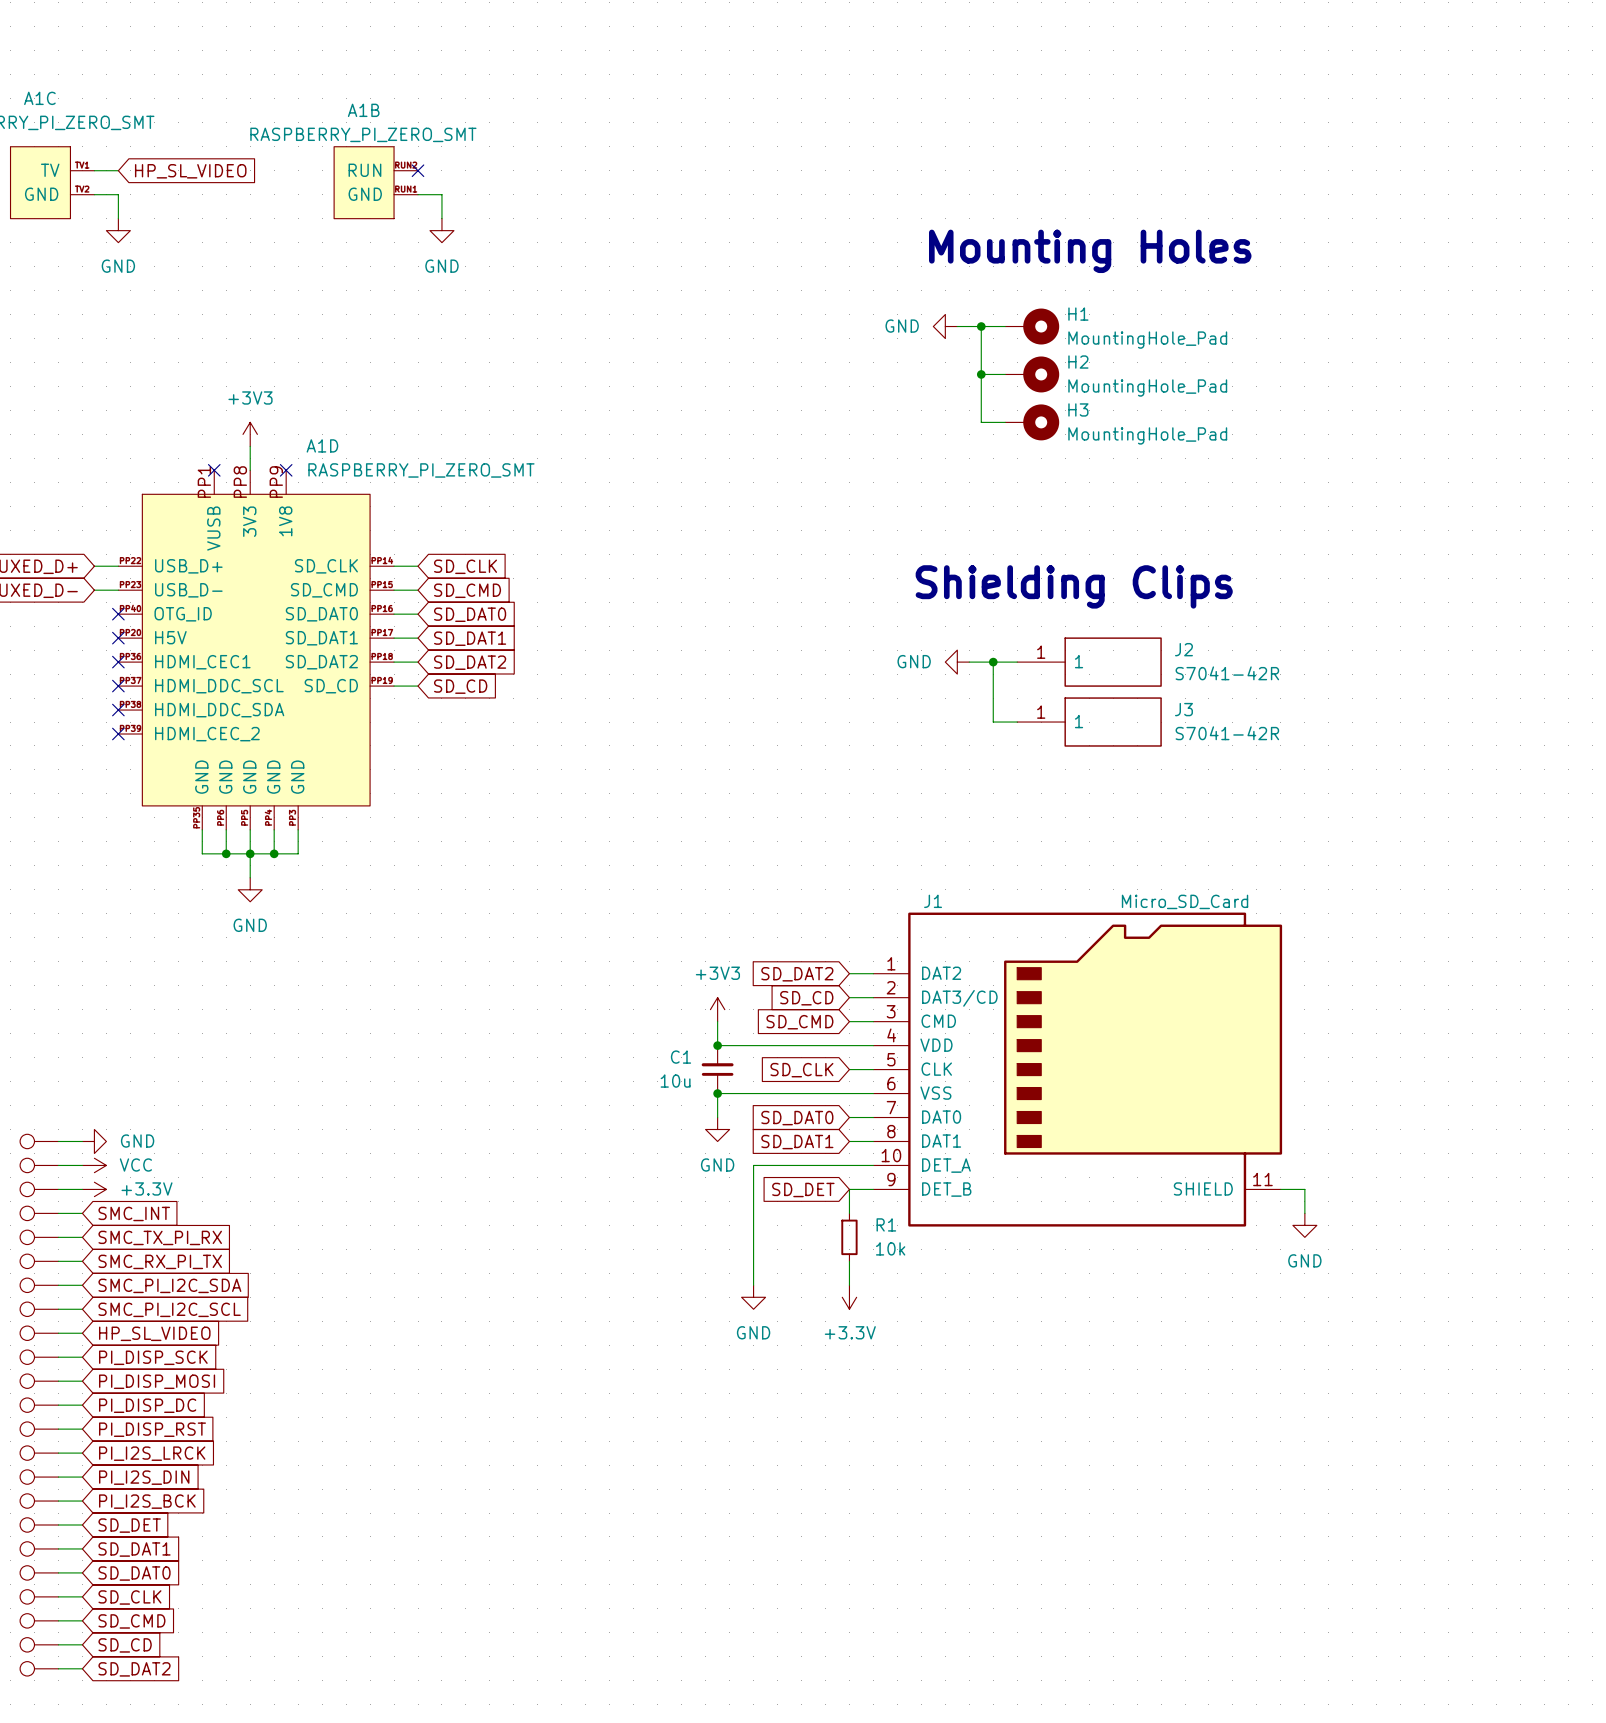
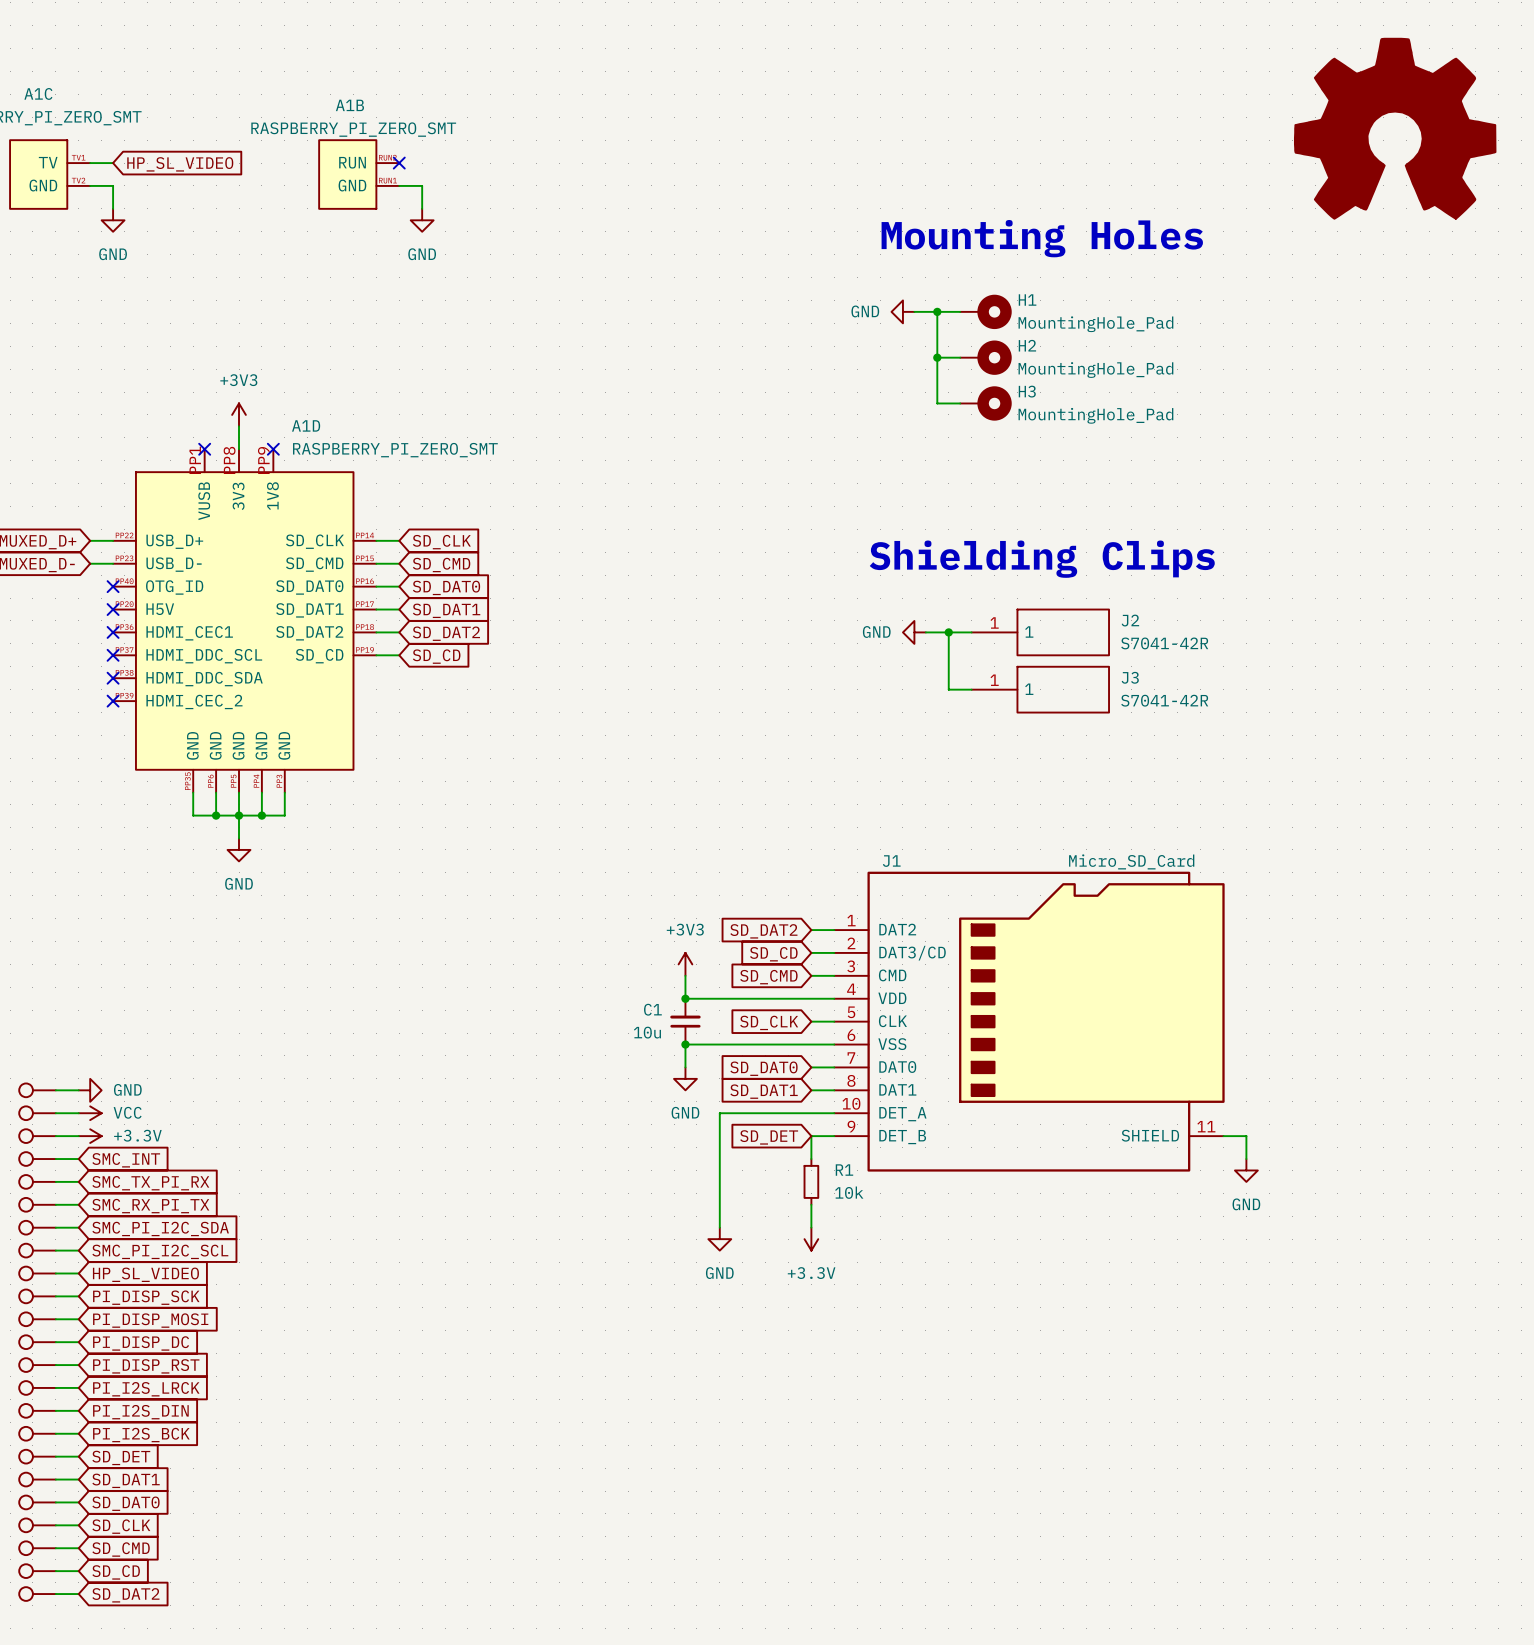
part: none -> (1395, 128)

